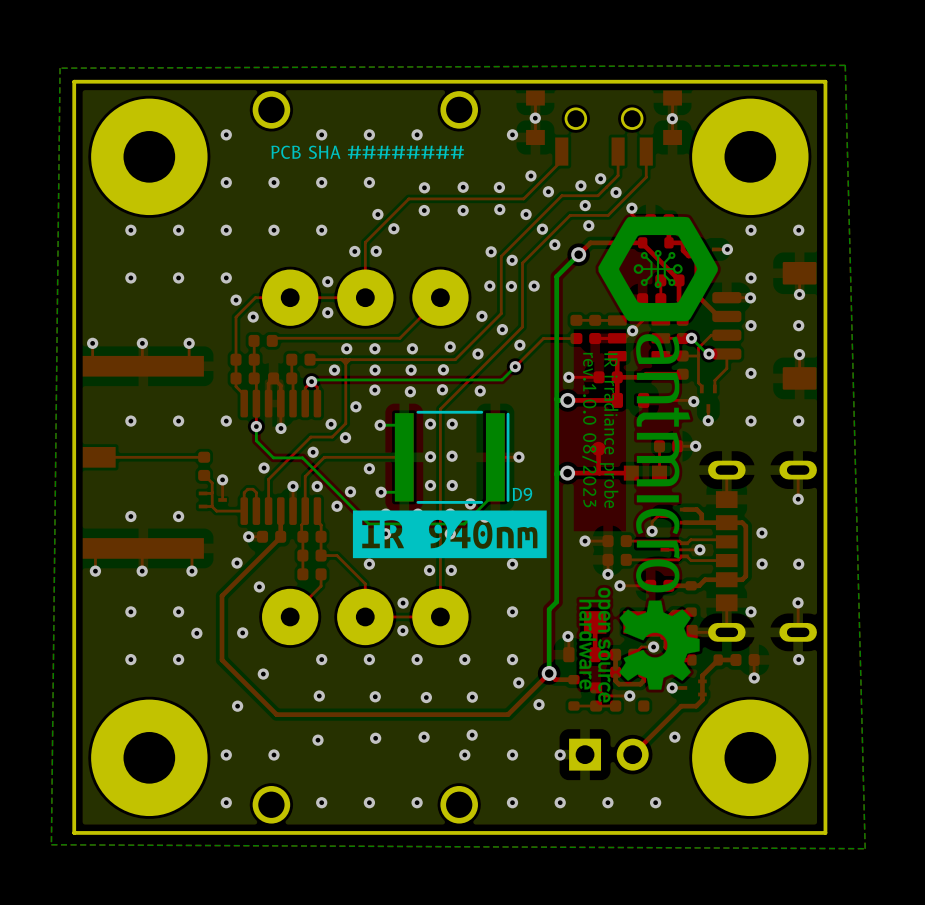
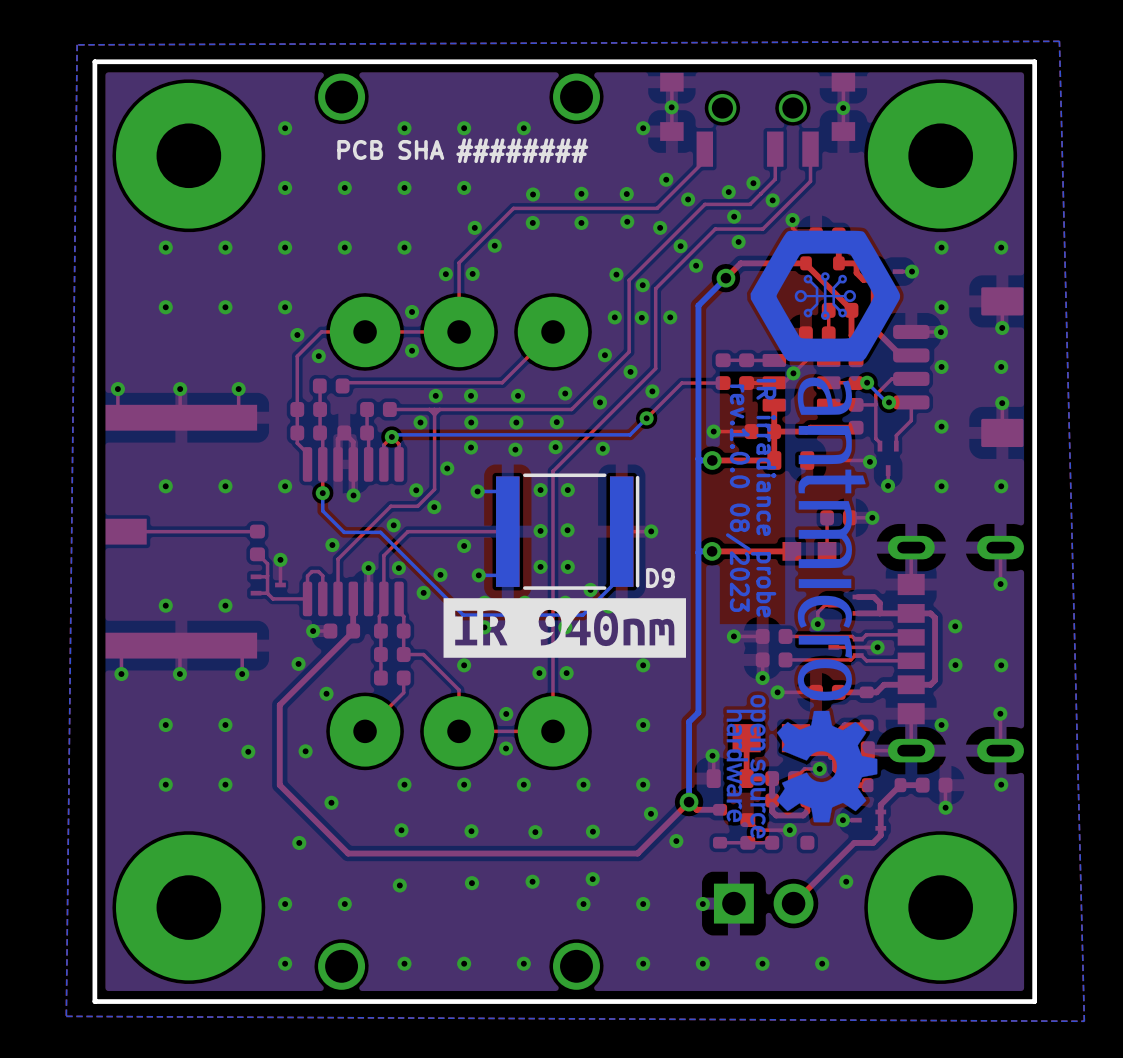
top track: (598, 448) (599, 473) -> none
part: (598, 448) -> none

